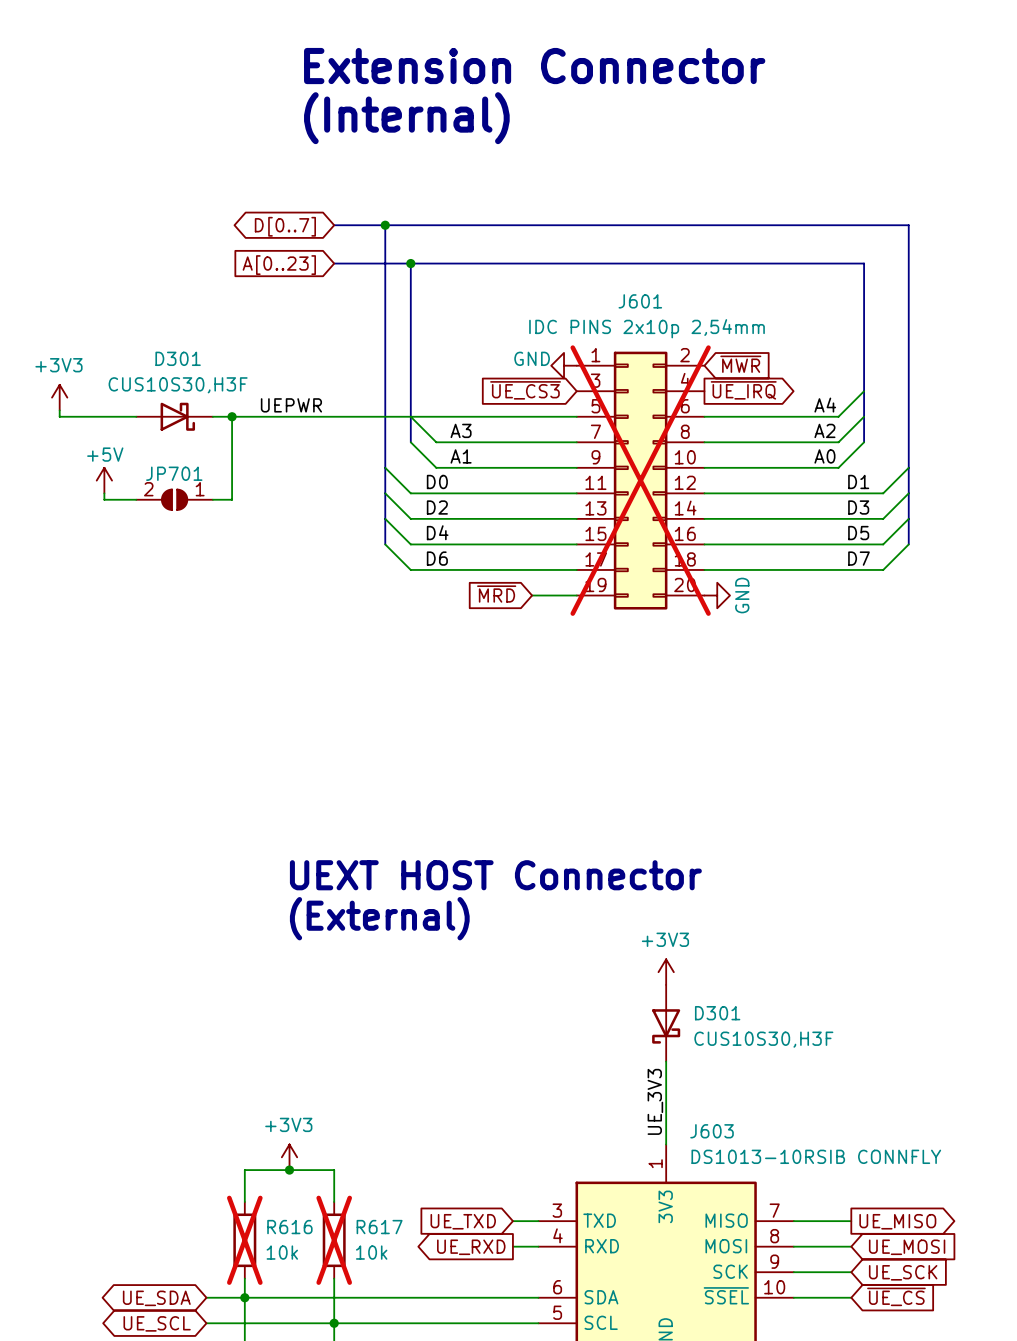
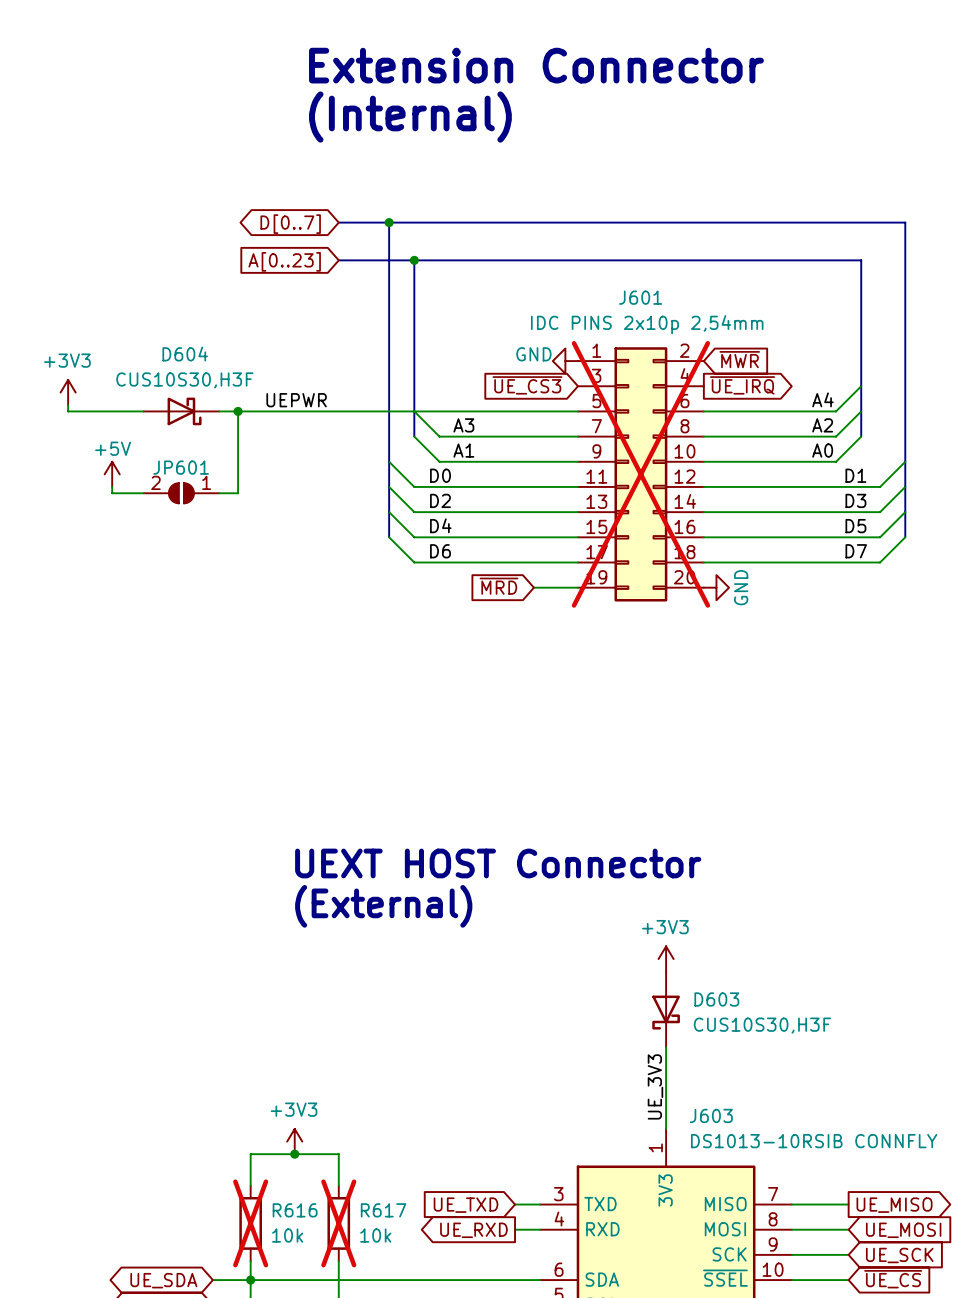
D301 name: D301 (178, 358) -> D604 (185, 354)
JP701 name: JP701 (174, 473) -> JP601 (181, 467)
D301 name: D301 (717, 1013) -> D603 (716, 999)

